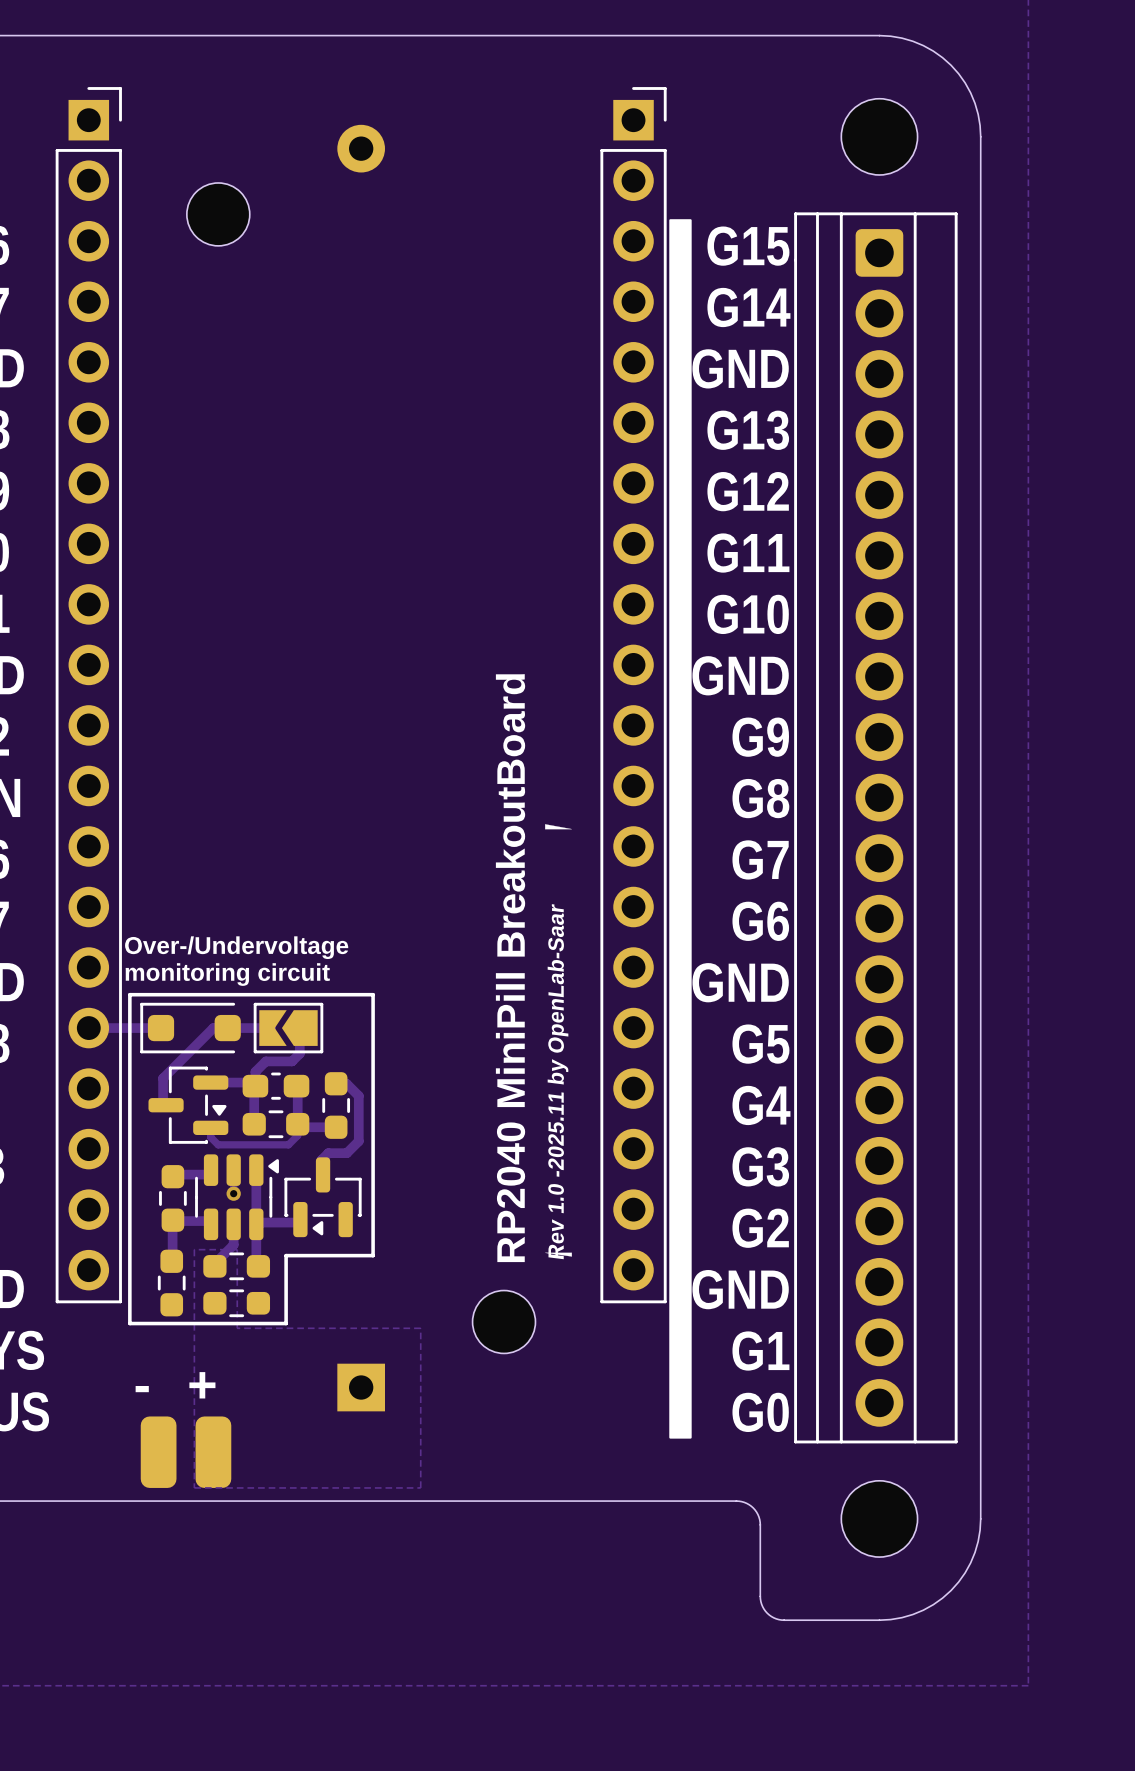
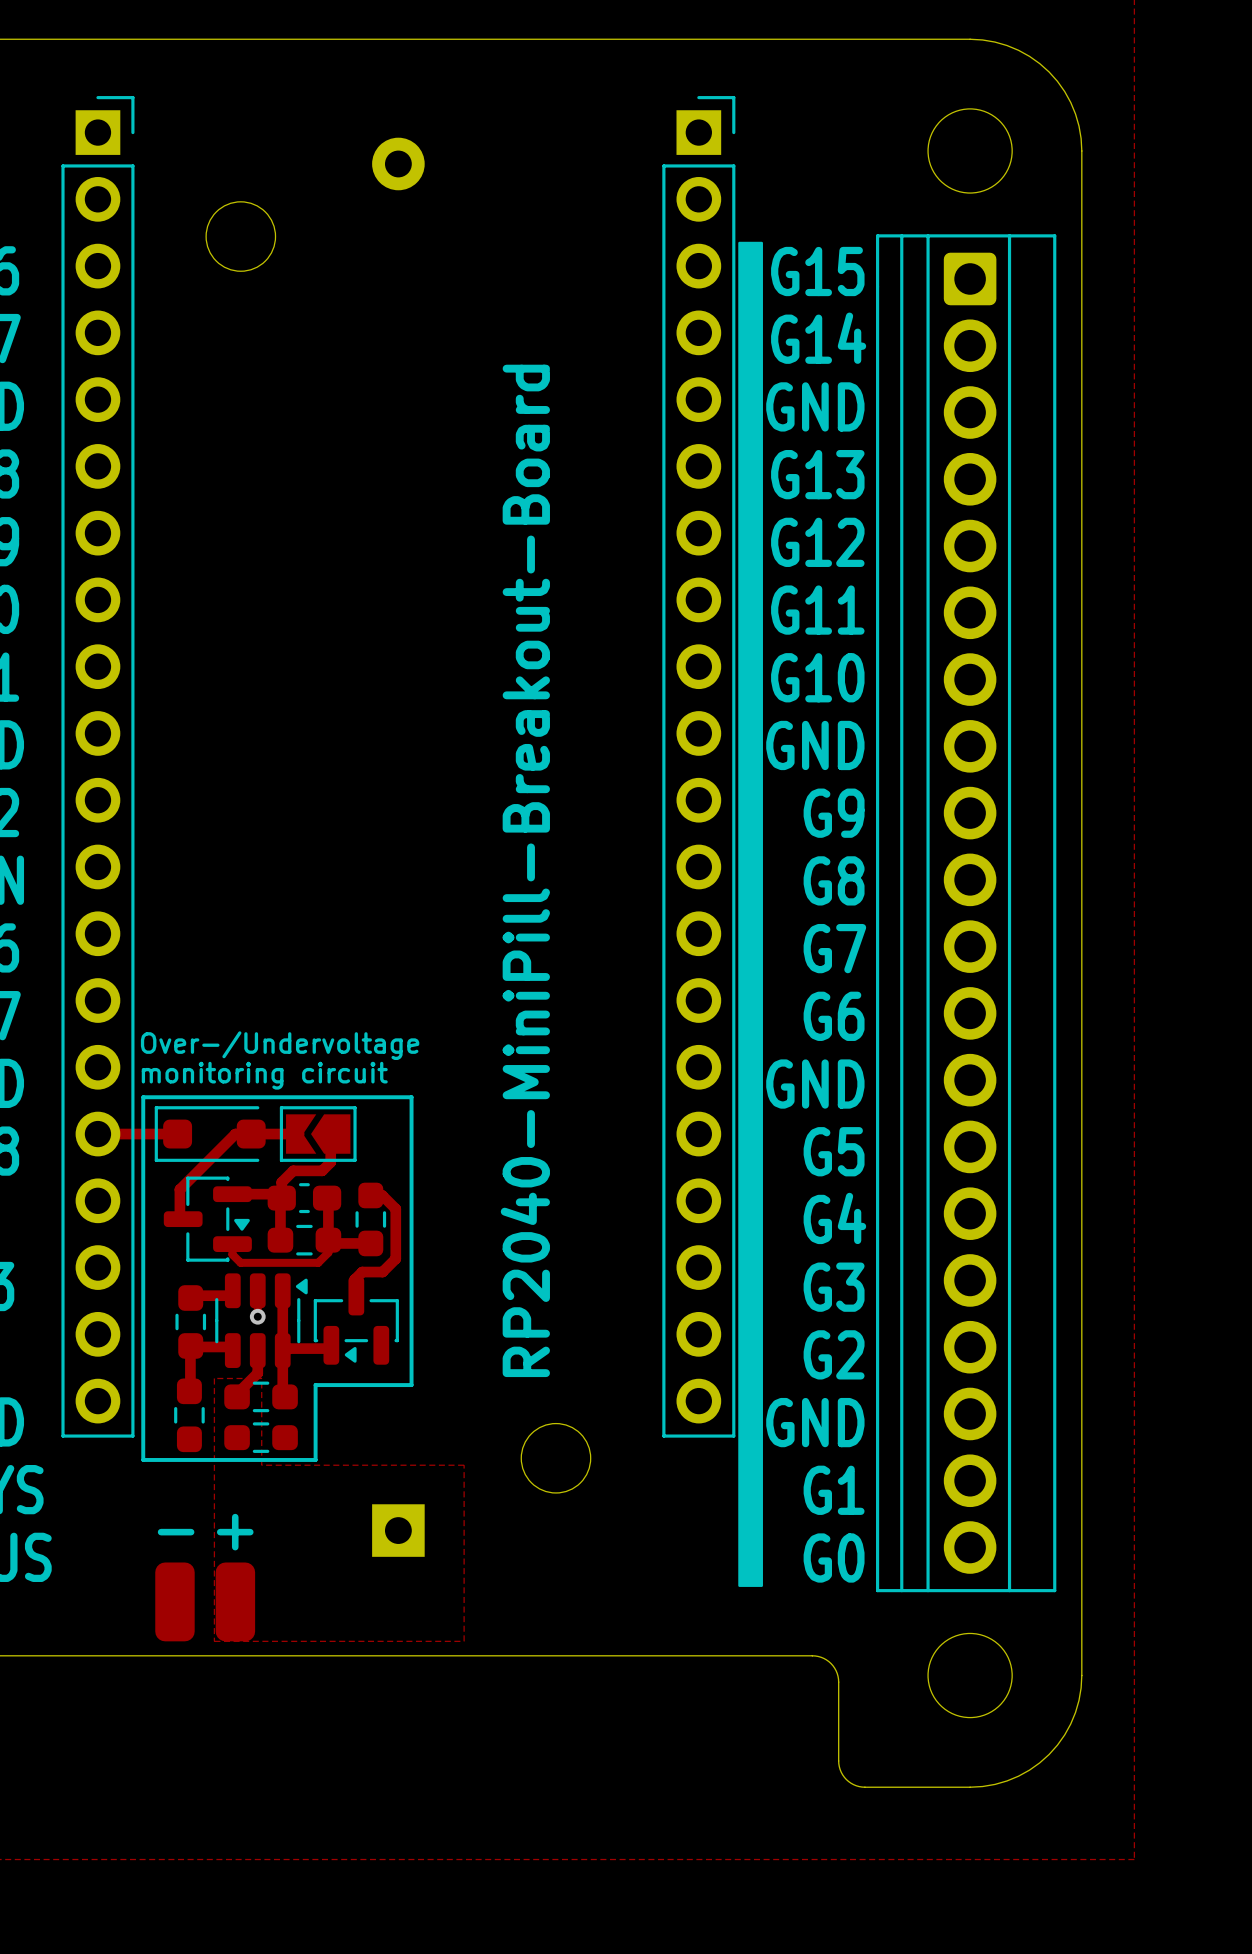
drawing: [545, 824, 572, 830] -> none
text: RP2040 MiniPill BreakoutBoard (510, 968) -> RP2040-MiniPill-Breakout-Board (525, 870)
text: Rev 1.0 -2025.11 by OpenLab-Saar (558, 1081) -> none
drawing: [545, 1252, 572, 1257] -> none

